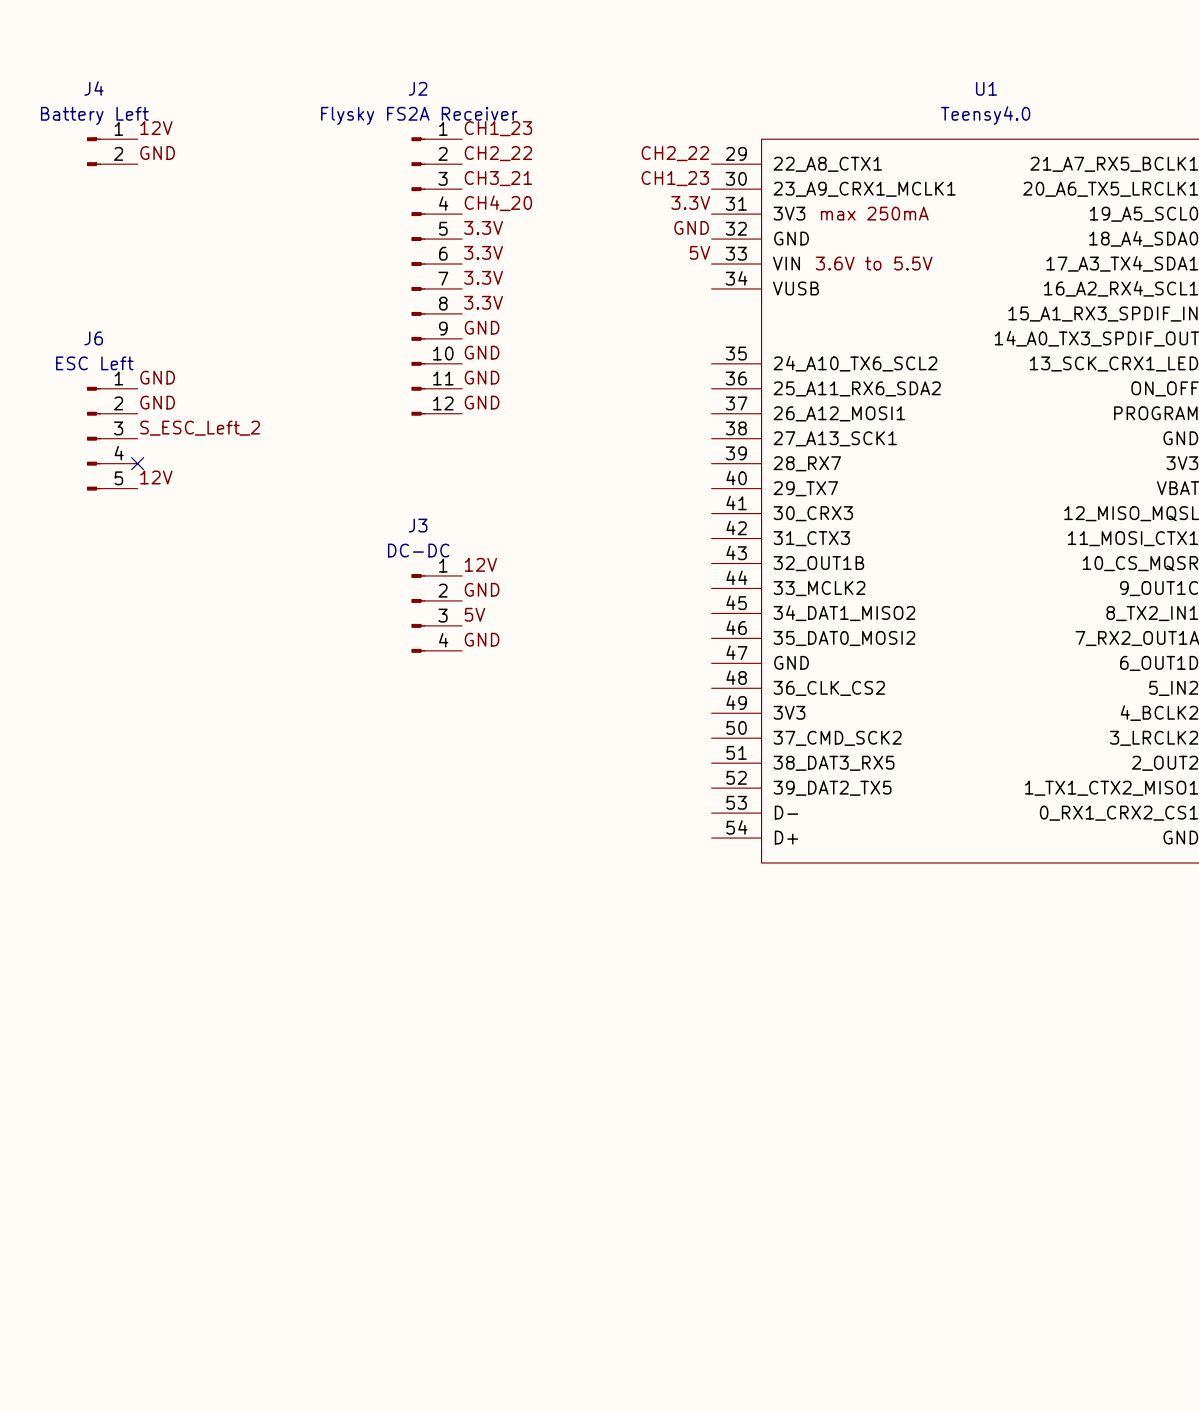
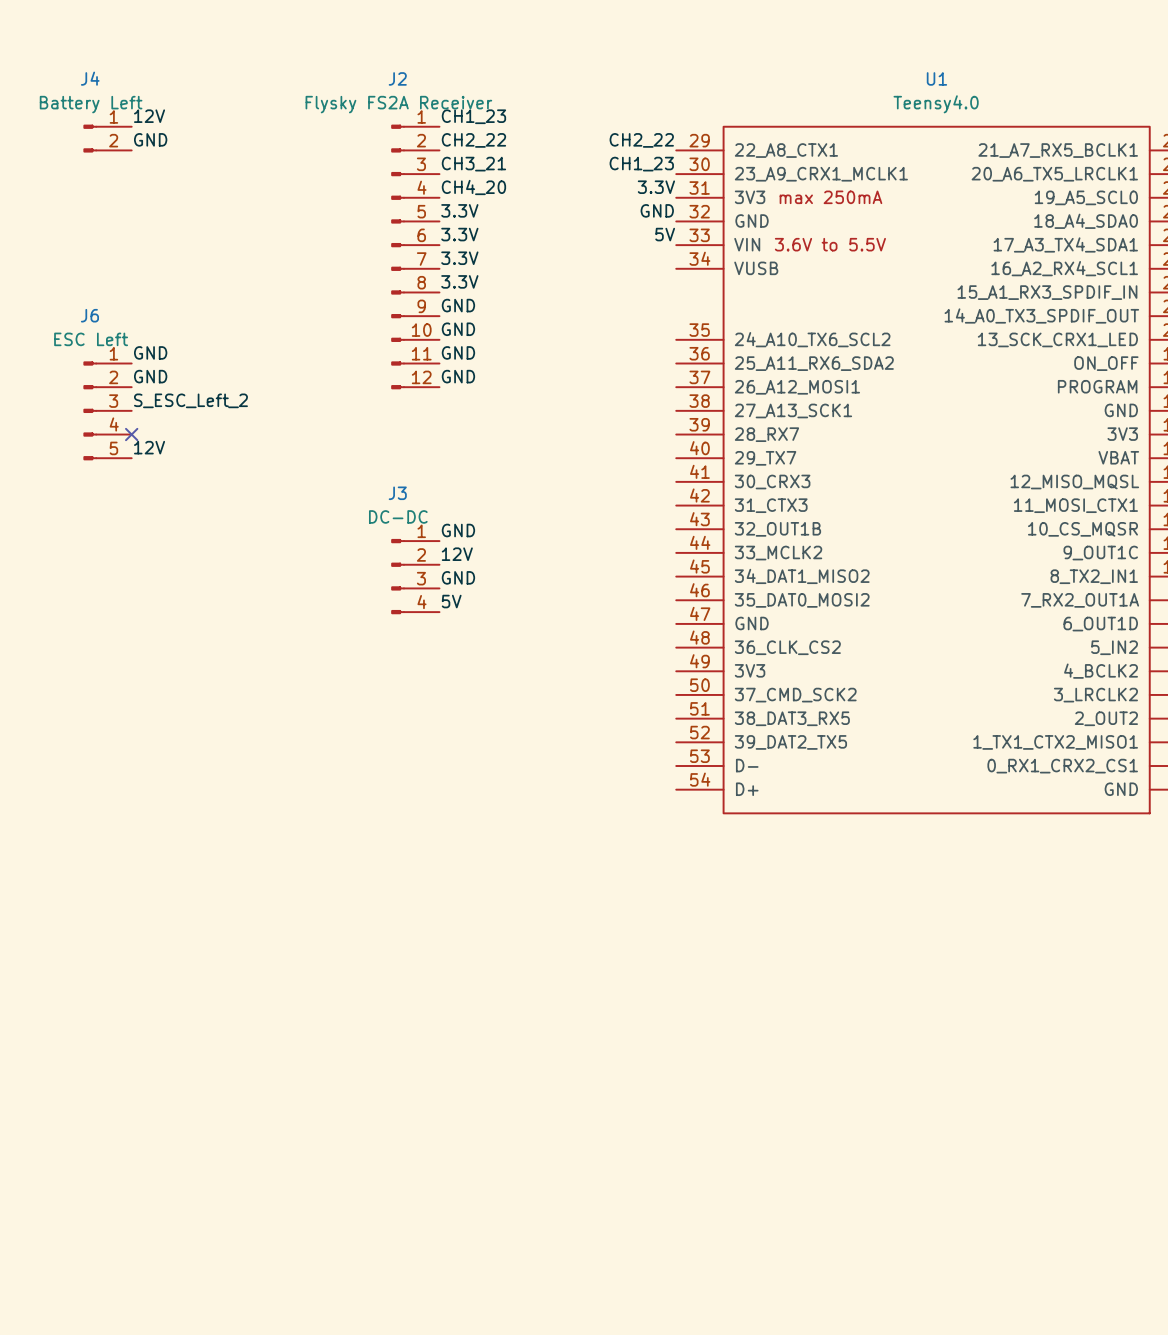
label: 12V (480, 564) -> GND (458, 530)
label: GND (482, 589) -> 12V (457, 554)
label: 5V (474, 614) -> GND (458, 577)
label: GND (482, 639) -> 5V (451, 601)

